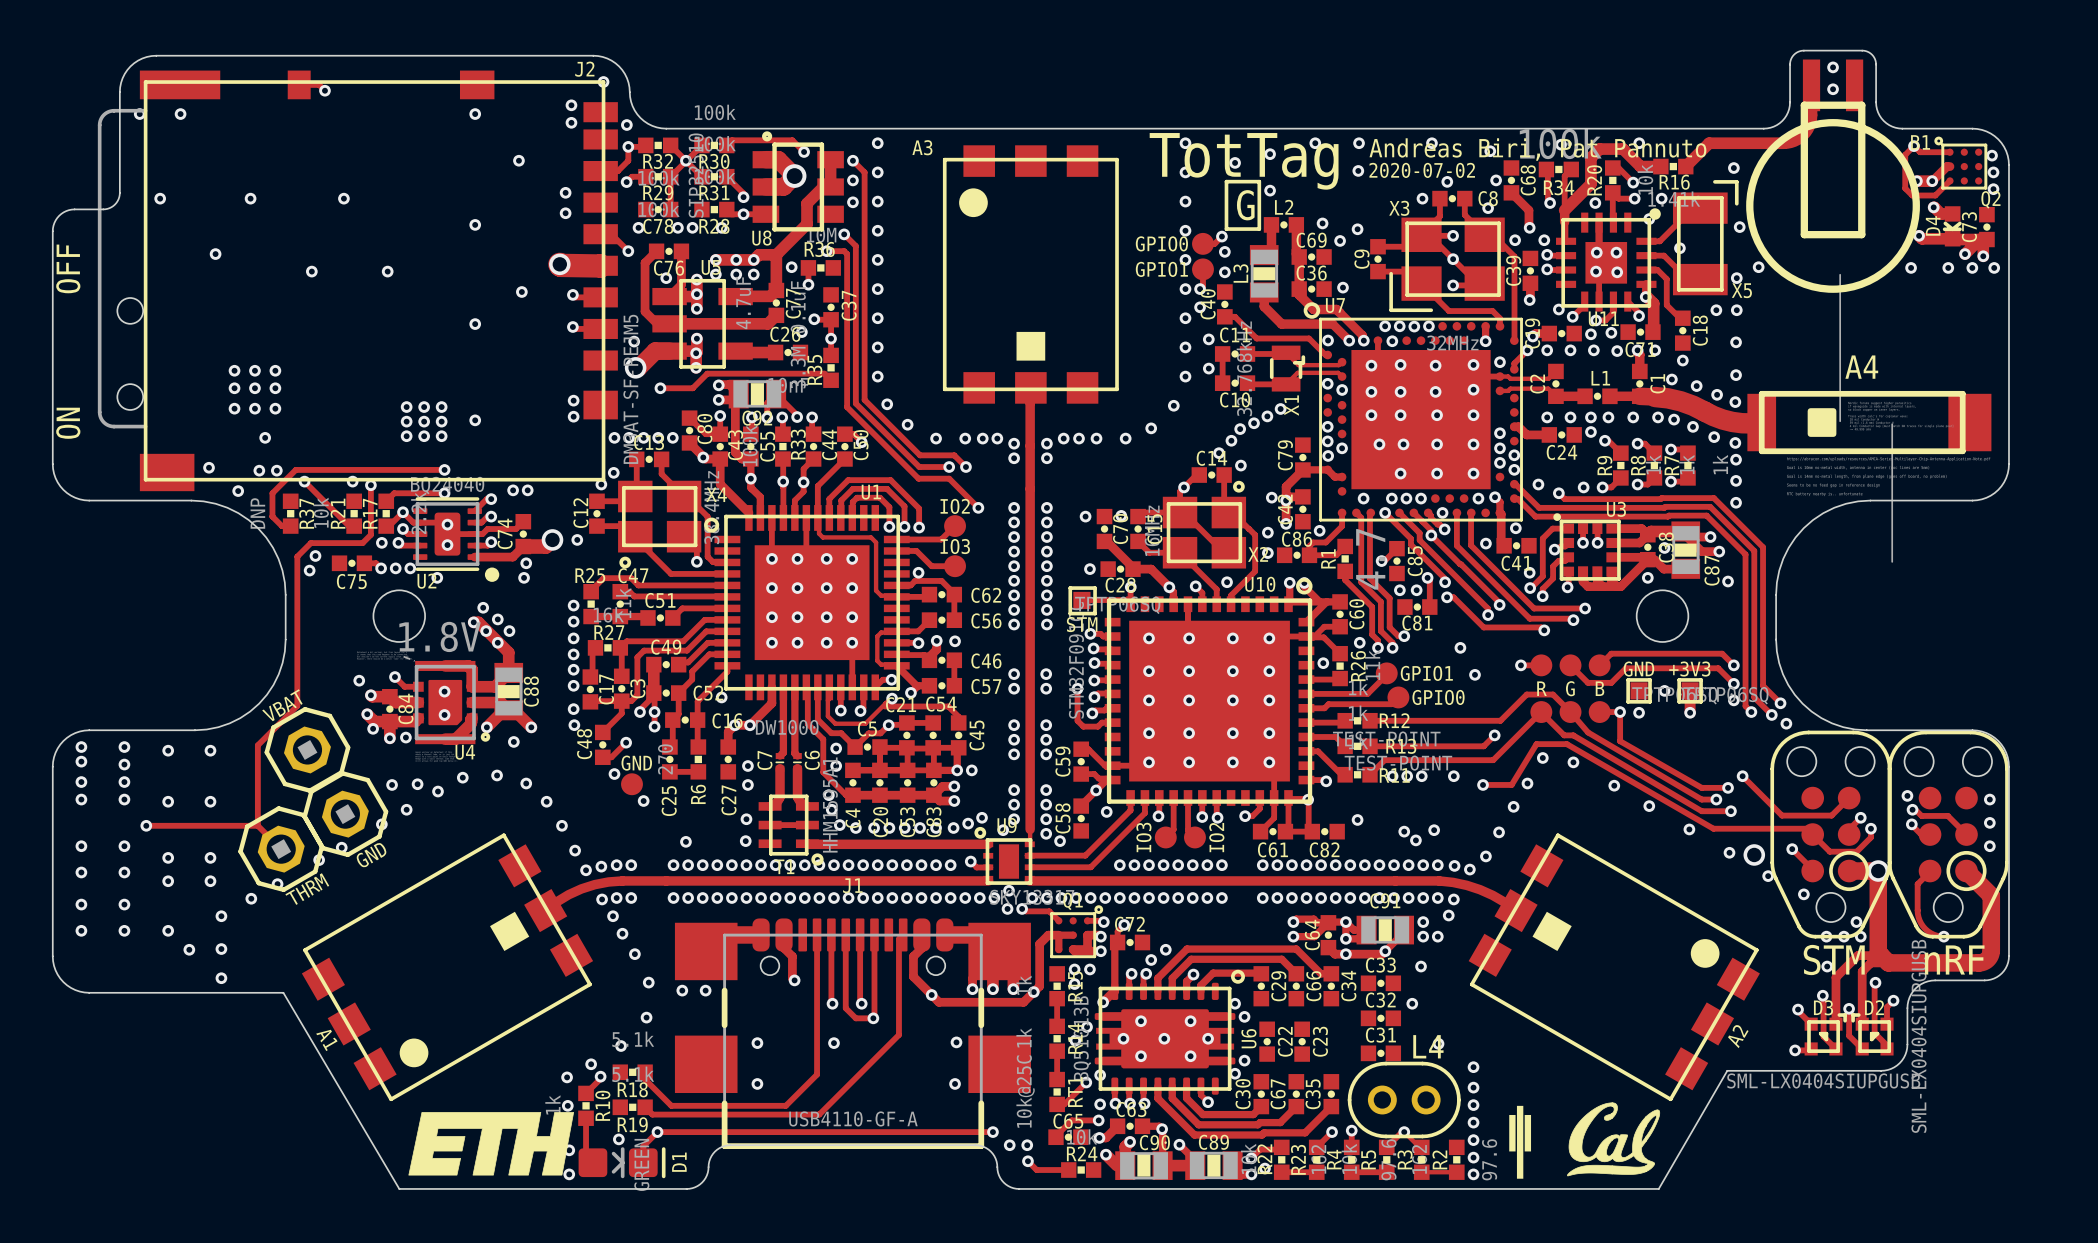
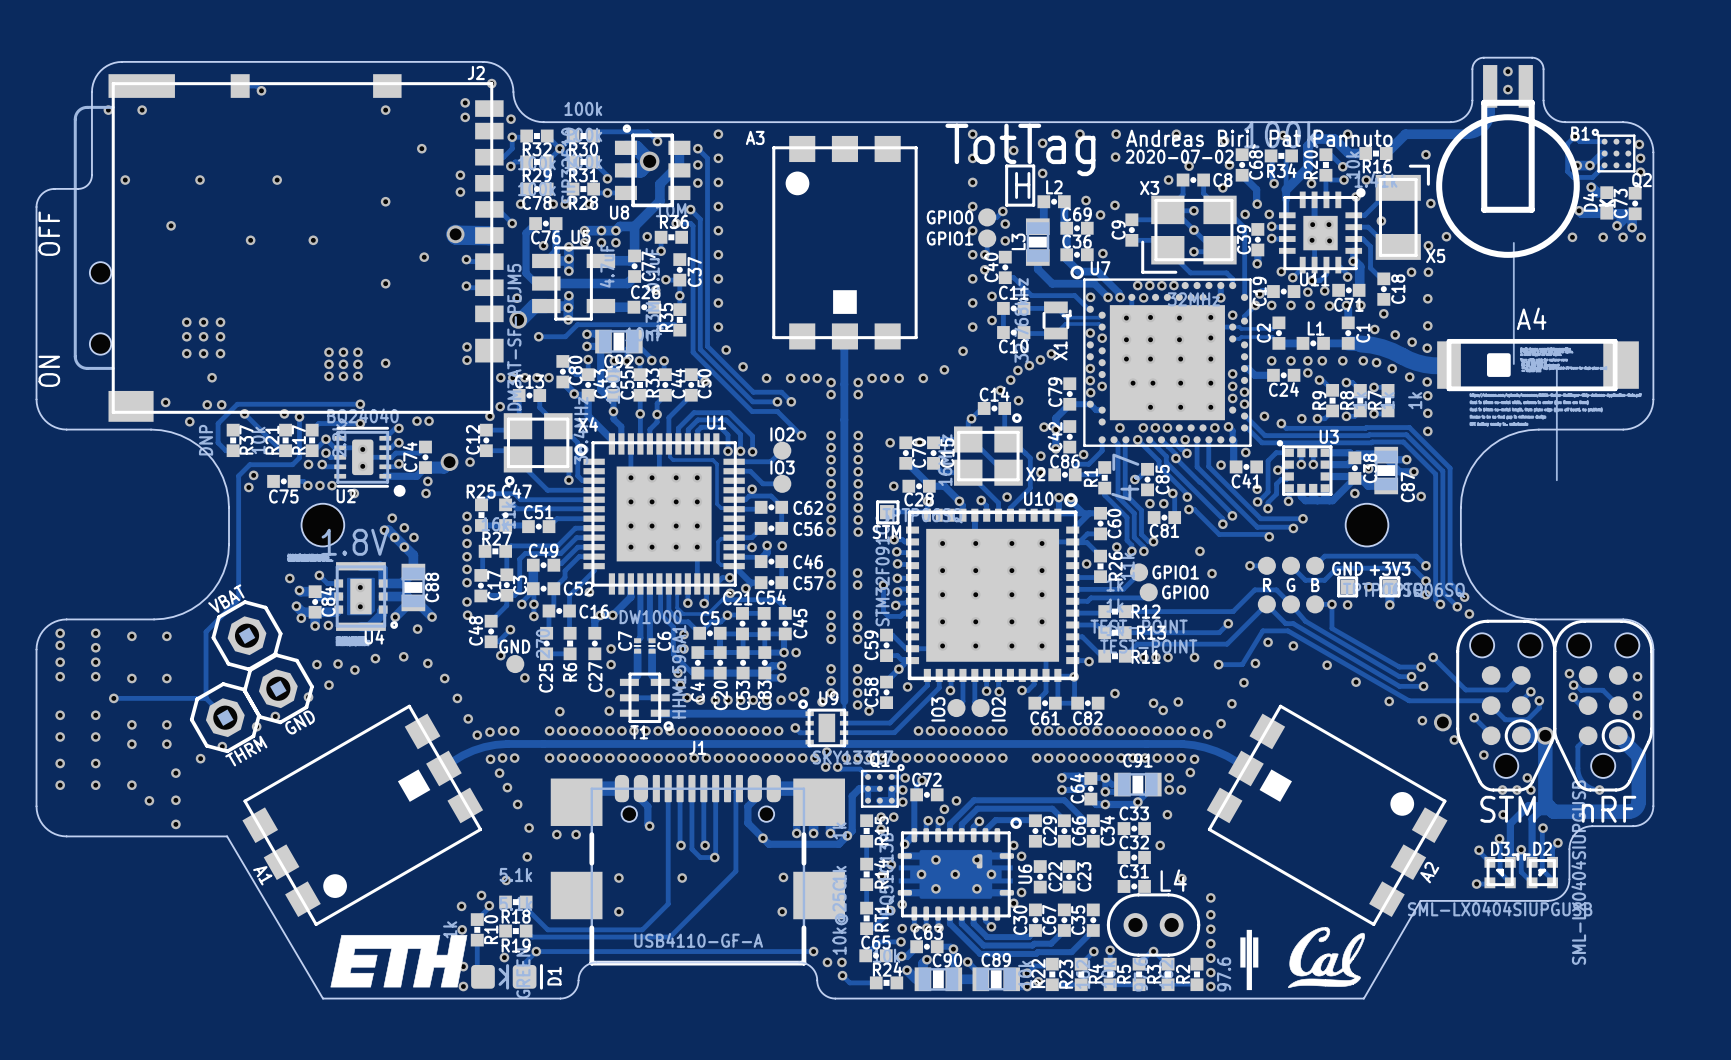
text: G (1245, 205) -> H (1022, 185)

